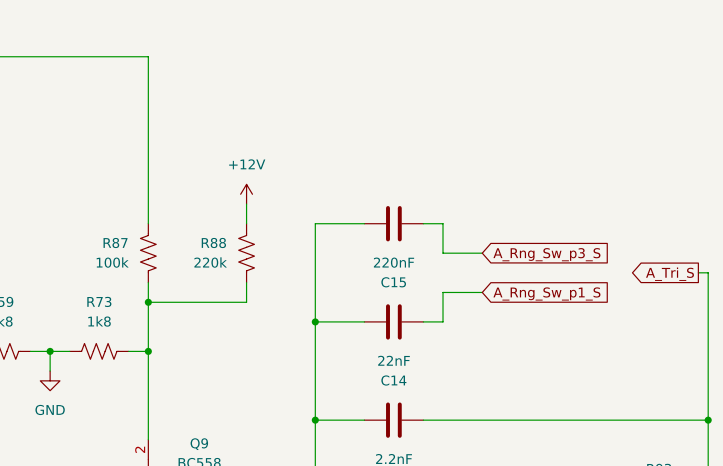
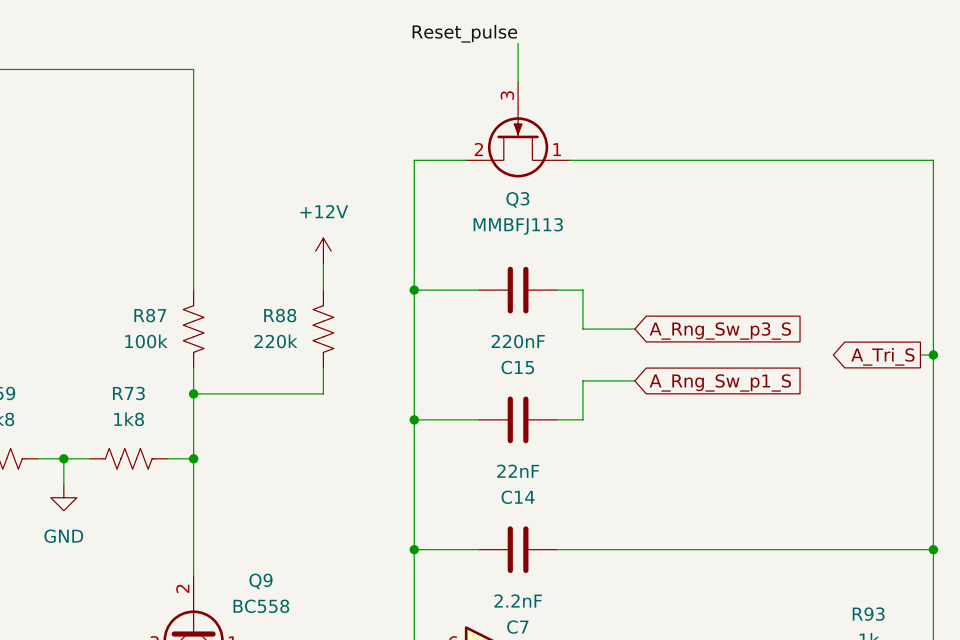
label: none -> Reset_pulse (464, 33)
wire: none -> (518, 43) (518, 82)
Q3: none -> MMBFJ113 (518, 129)
wire: none -> (466, 160) (414, 160) (414, 290)
wire: none -> (569, 160) (933, 160) (933, 354)
junction: none -> (414, 290)
junction: none -> (933, 354)

